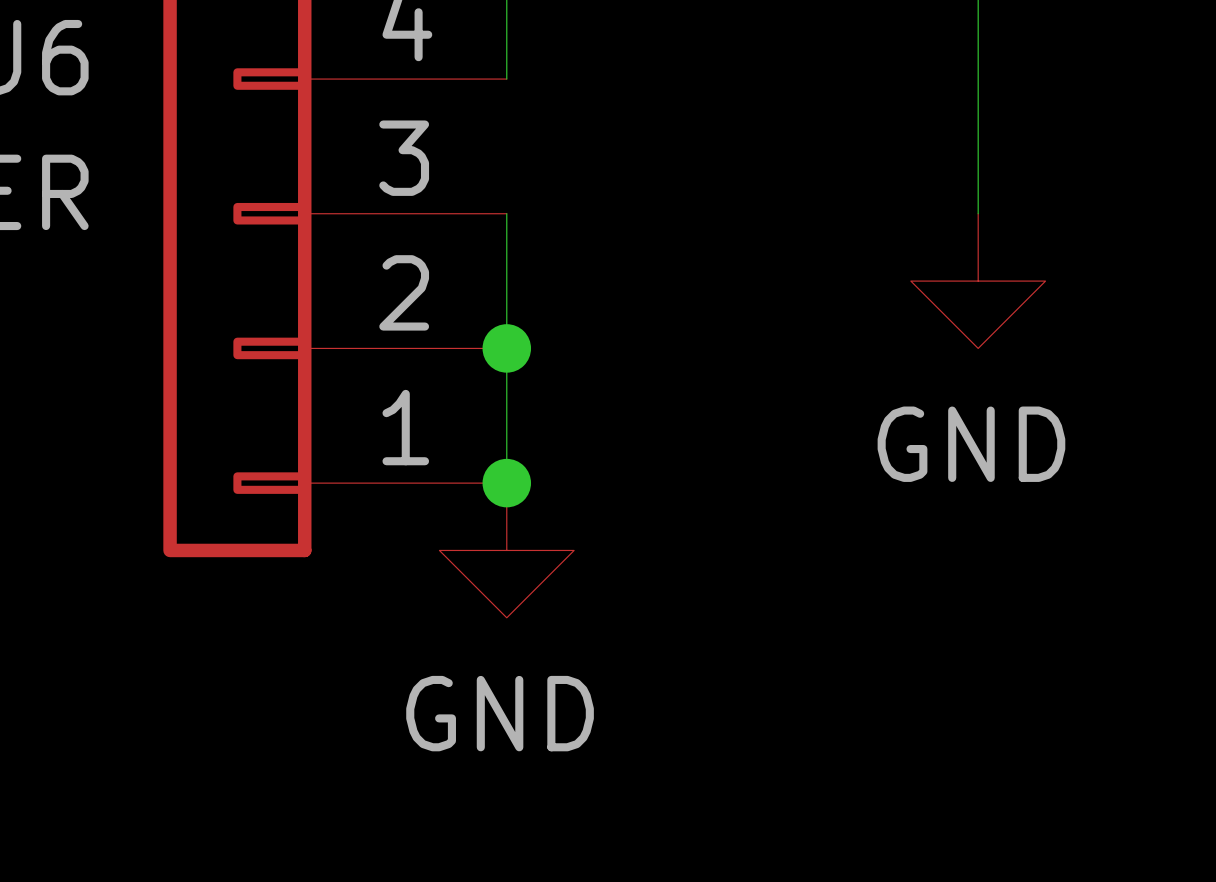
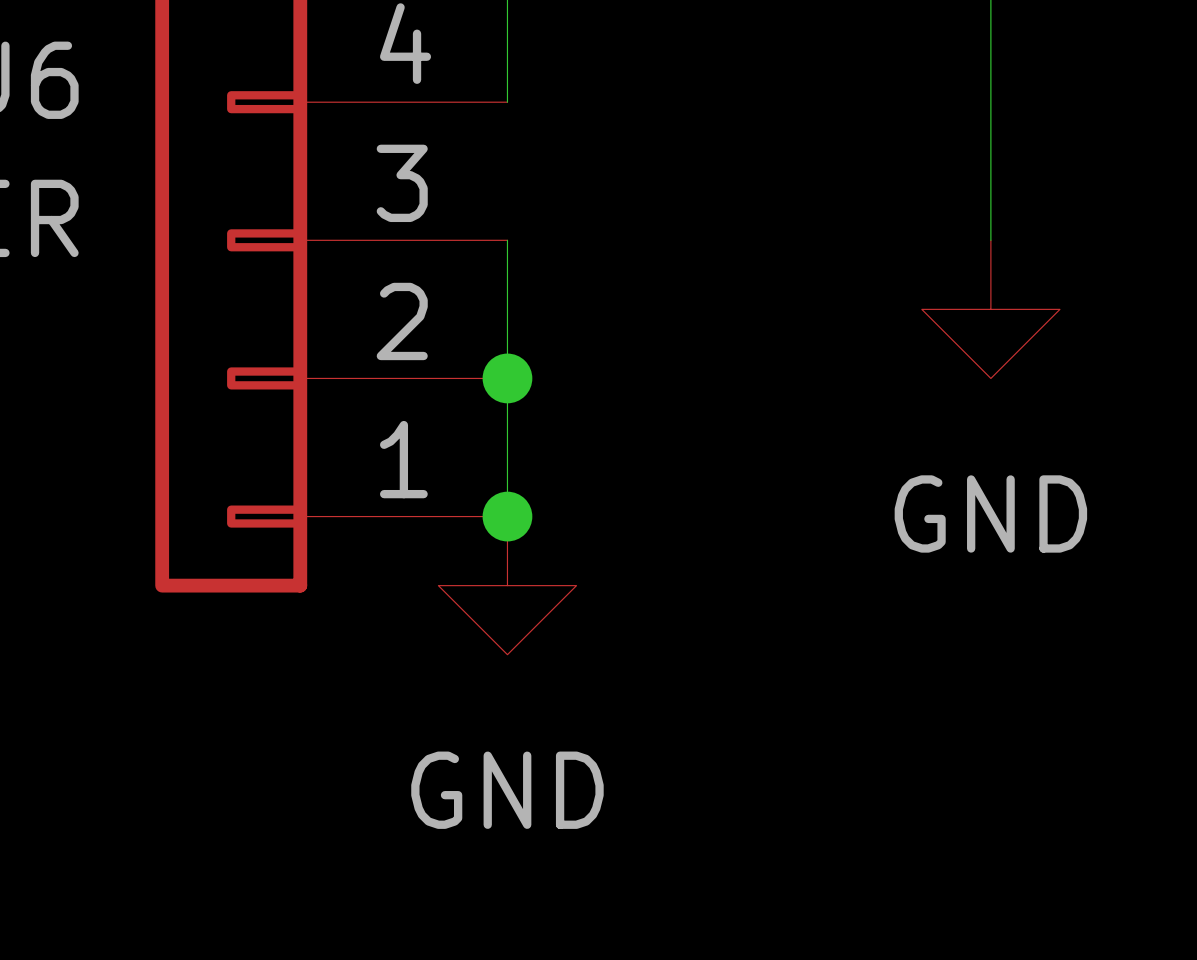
power symbol text position: GND (971, 444) -> GND (990, 513)
power symbol text position: GND (500, 713) -> GND (507, 790)

